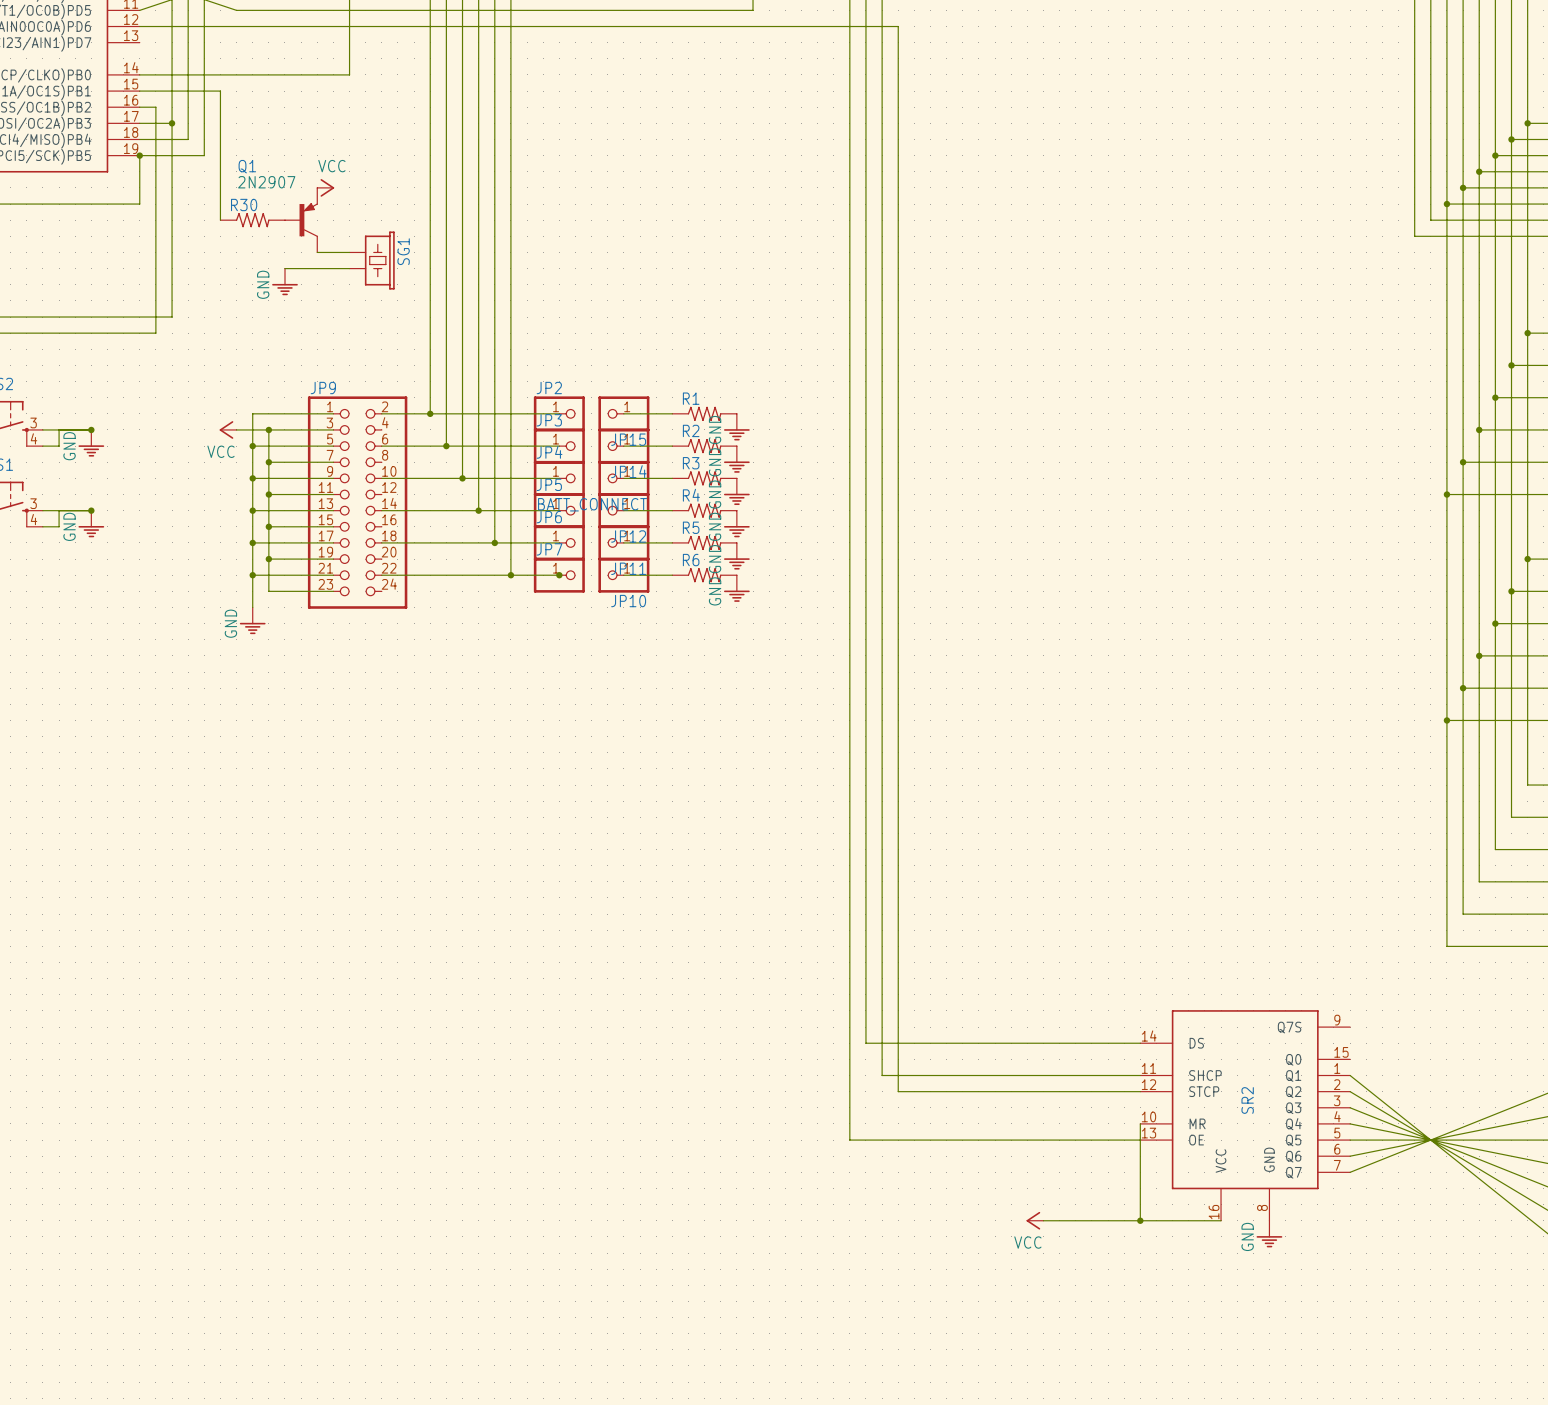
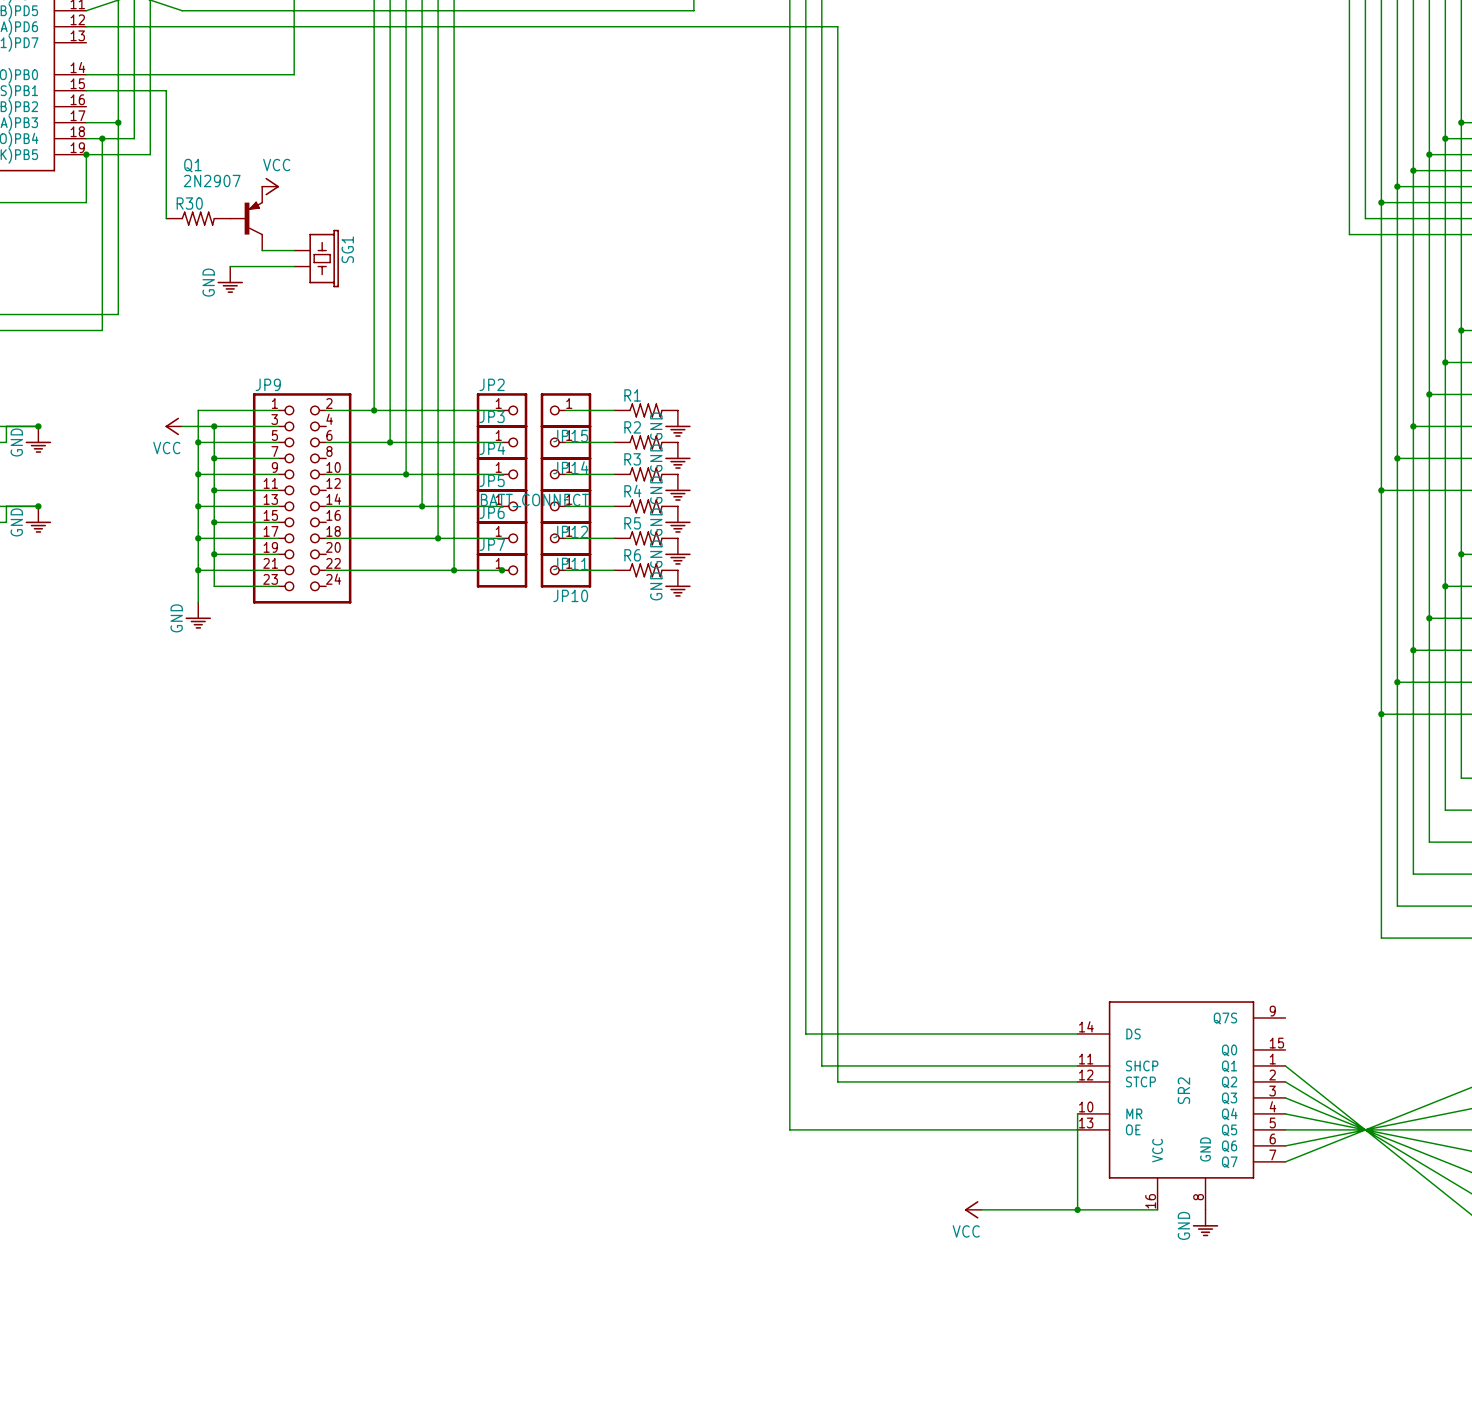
wire: (139, 107) (155, 107) (155, 139) -> none
junction: none -> (102, 138)

